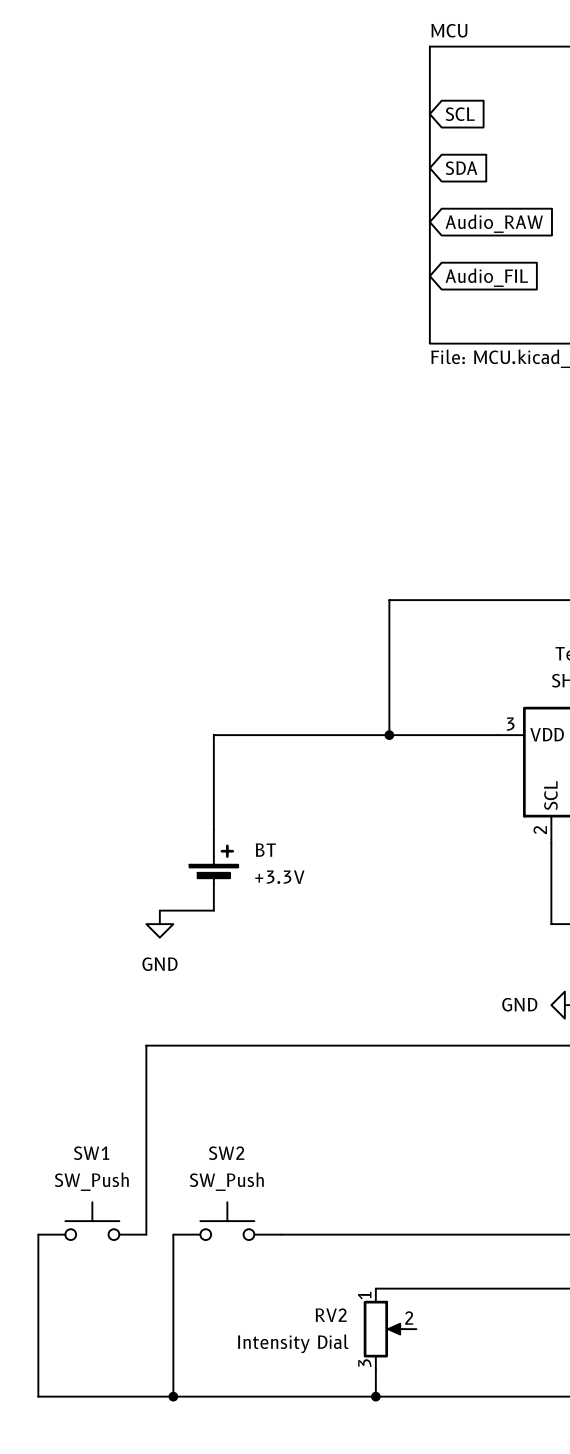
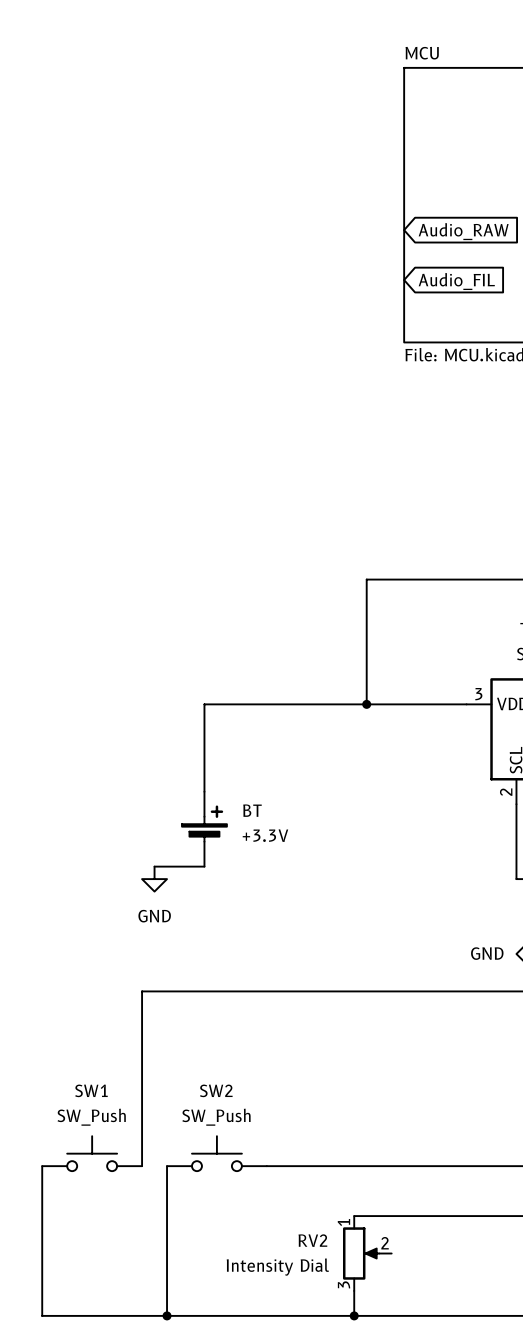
global label: SCL (460, 114) -> none
global label: SDA (461, 168) -> none

